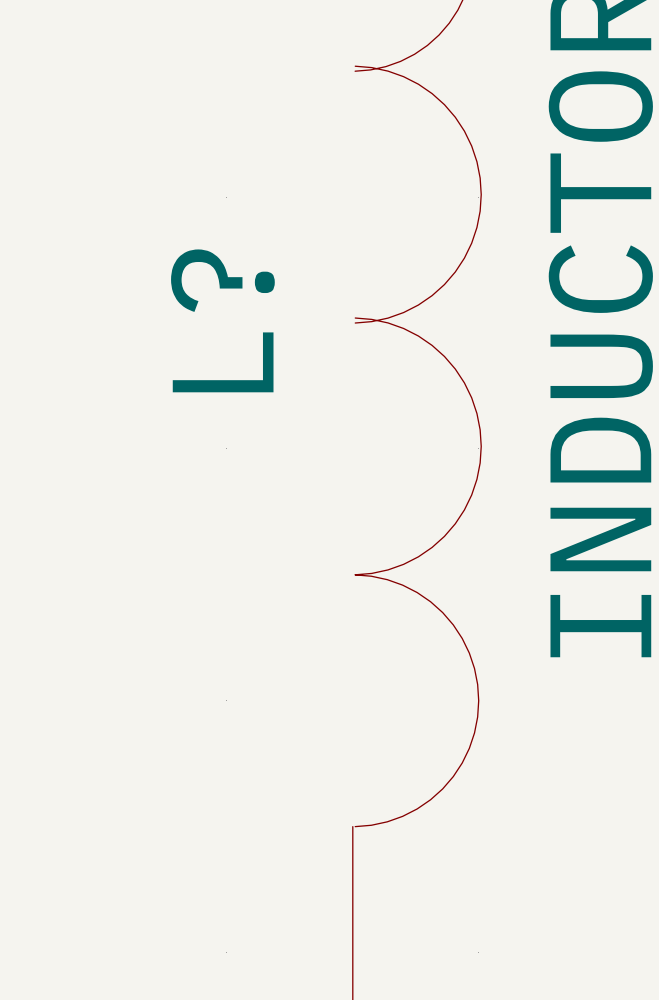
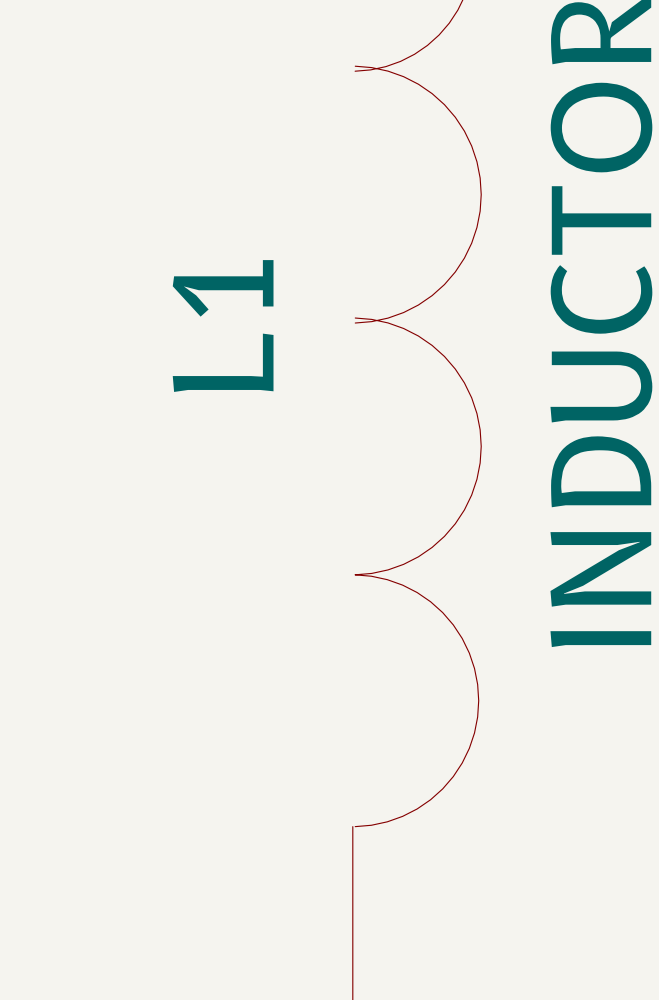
L? name: L? (222, 320) -> L1 (223, 326)

